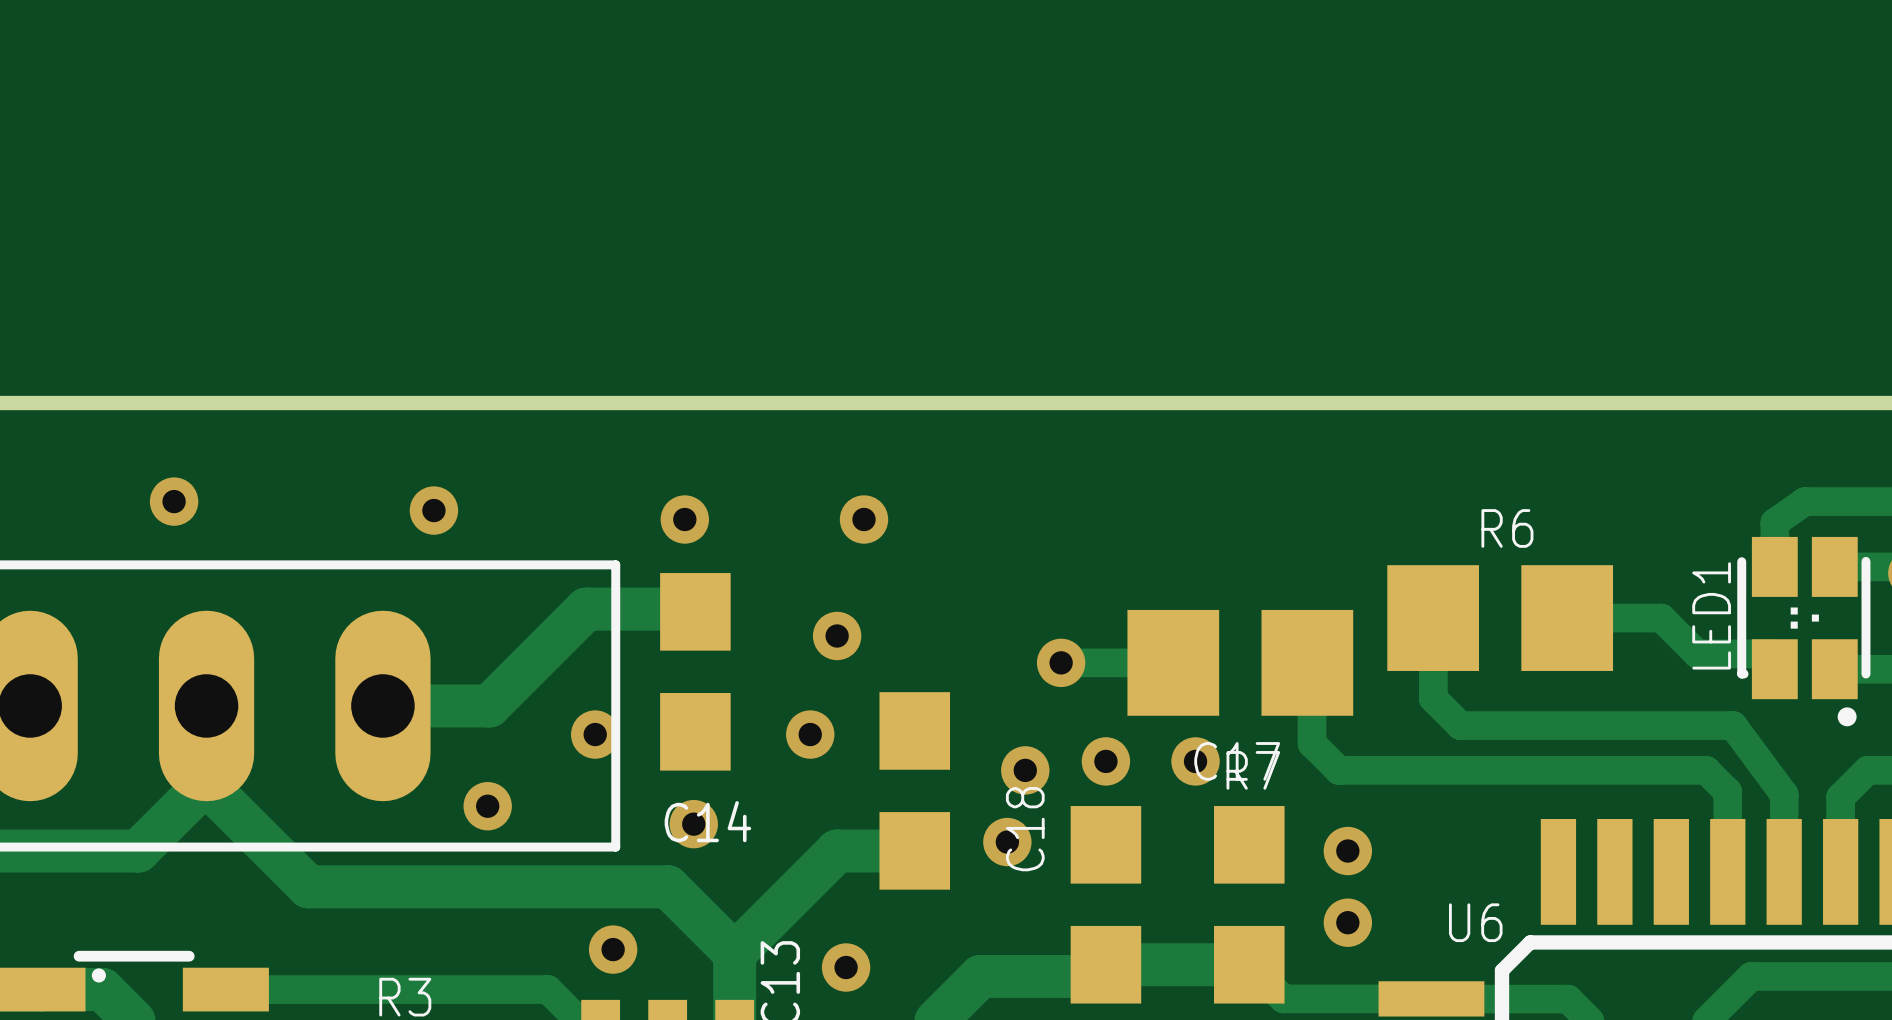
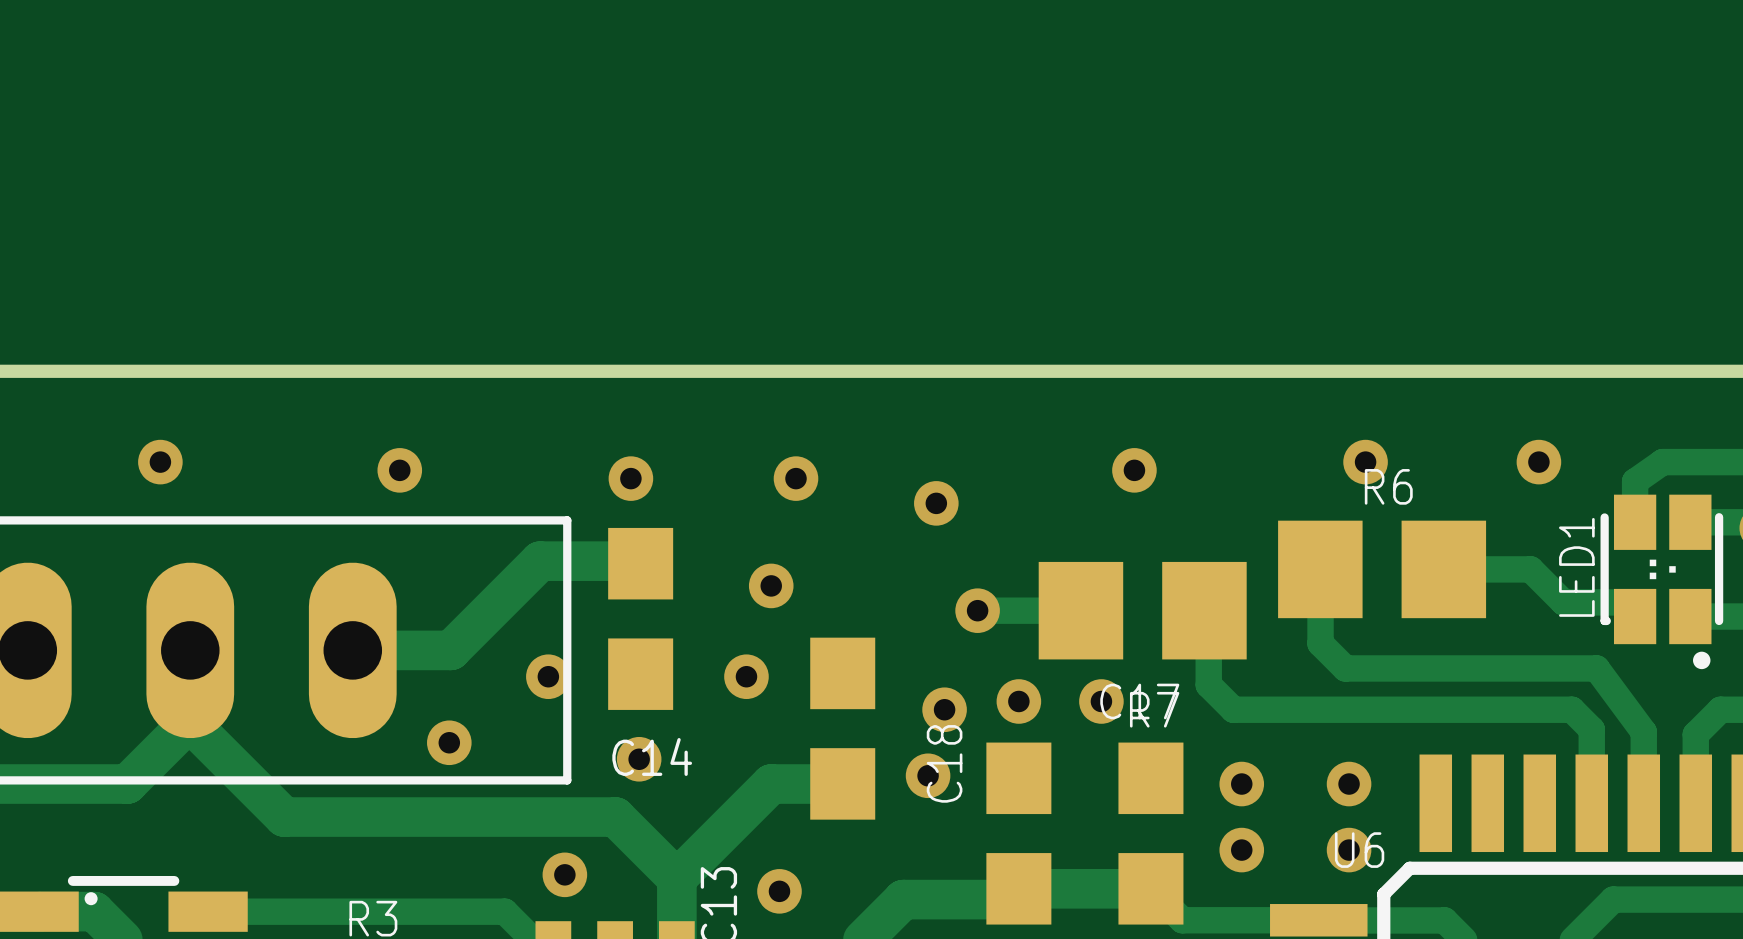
via: none -> (1365, 462)
via: none -> (1538, 462)
via: none -> (1134, 470)
via: none -> (936, 503)
via: none -> (1349, 784)
via: none -> (1349, 850)

